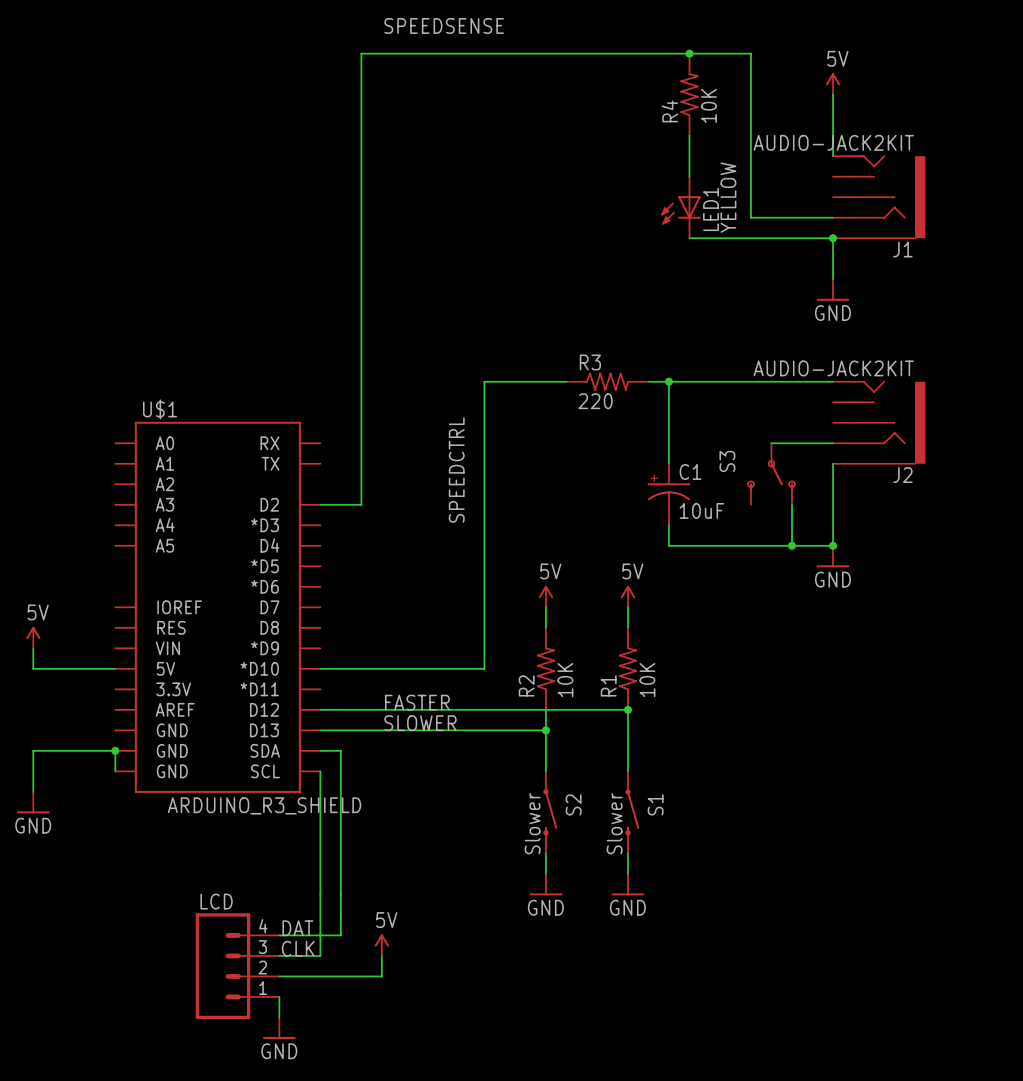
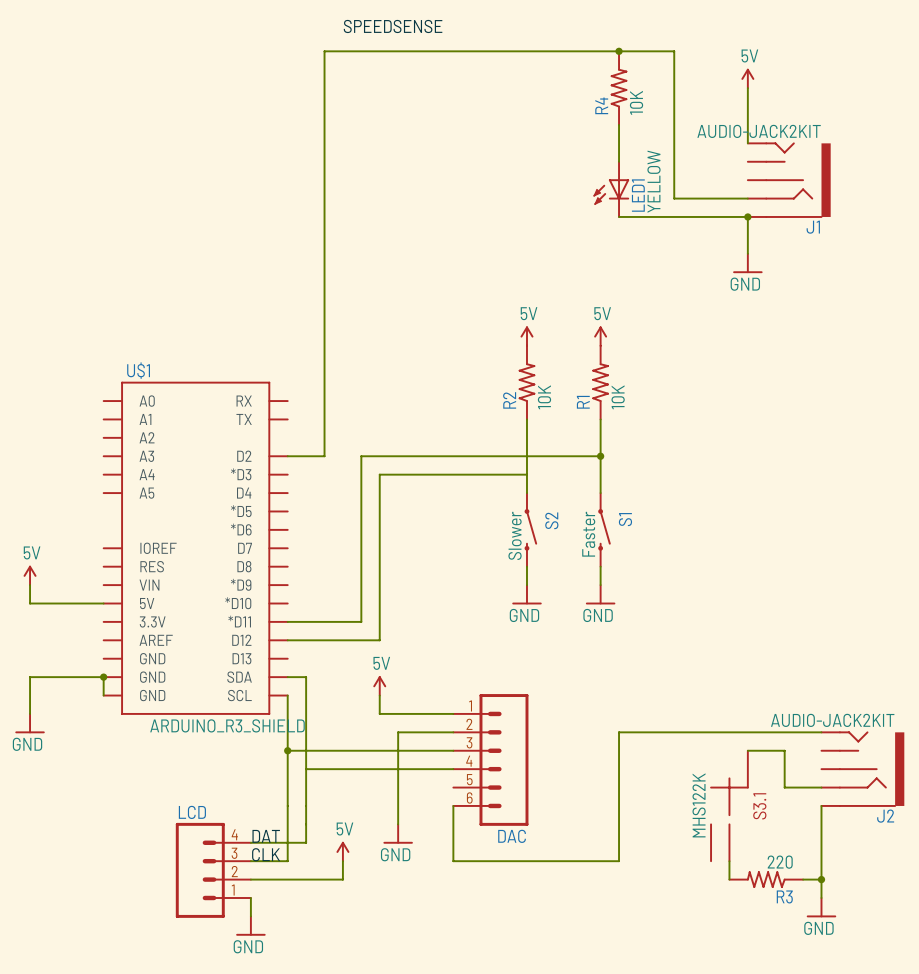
power symbol: none -> 5V (526, 336)
power symbol: none -> 5V (600, 336)
wire: (566, 381) (484, 381) (484, 668) (320, 668) -> none
R3 rotation: 0° (607, 381) -> 180° (766, 879)
R3 position: (607, 381) -> (766, 879)
wire: (648, 381) (833, 381) -> none
junction: (668, 381) -> none
J2 position: (879, 422) -> (862, 769)
wire: (771, 443) (833, 443) -> none
wire: none -> (526, 419) (526, 493)
wire: (833, 463) (833, 545) (668, 545) -> none
label: SPEEDCTRL (456, 470) -> none
S3: (771, 474) -> none
C1: 10uF (668, 494) -> none
wire: none -> (600, 456) (361, 456) (361, 621) (287, 621)
junction: none -> (600, 456)
wire: (792, 504) (792, 545) -> none
junction: (792, 545) -> none
junction: (833, 545) -> none
power symbol: GND (833, 556) -> none
power symbol: 5V (545, 596) -> none
power symbol: 5V (627, 596) -> none
wire: (545, 607) (545, 627) -> (526, 566) (526, 585)
wire: (627, 607) (627, 627) -> (600, 566) (600, 585)
power symbol: none -> GND (526, 594)
power symbol: none -> GND (600, 594)
R2 position: (545, 668) -> (526, 382)
R1 position: (627, 668) -> (600, 382)
label: FASTER (417, 702) -> none
wire: (422, 709) (627, 709) (627, 771) -> (379, 640) (379, 474) (526, 474)
wire: (545, 709) (545, 771) -> none
junction: (627, 709) -> none
label: SLOWER (420, 723) -> none
wire: (320, 730) (545, 730) -> none
junction: (545, 730) -> none
power symbol: none -> 5V (379, 685)
wire: none -> (379, 695) (379, 713) (453, 713)
wire: none -> (453, 732) (398, 732) (398, 824)
S2 position: (550, 812) -> (530, 529)
S1 position: (632, 812) -> (604, 529)
wire: none -> (821, 732) (619, 732) (619, 861) (453, 861) (453, 805)
S1 value: Slower (614, 823) -> Faster (588, 534)
wire: none -> (287, 750) (453, 750)
junction: none -> (287, 750)
wire: none -> (747, 750) (784, 750) (784, 787) (821, 787)
DAC: none -> (490, 759)
wire: none -> (306, 769) (453, 769)
wire: (545, 853) (545, 873) -> none
wire: (627, 853) (627, 873) -> none
power symbol: GND (545, 884) -> none
power symbol: GND (627, 884) -> none
S3.1: none -> MHS122K (729, 805)
wire: none -> (821, 805) (821, 897)
power symbol: none -> GND (398, 834)
wire: none -> (729, 861) (729, 879)
wire: none -> (803, 879) (821, 879)
junction: none -> (821, 879)
power symbol: none -> GND (821, 907)

